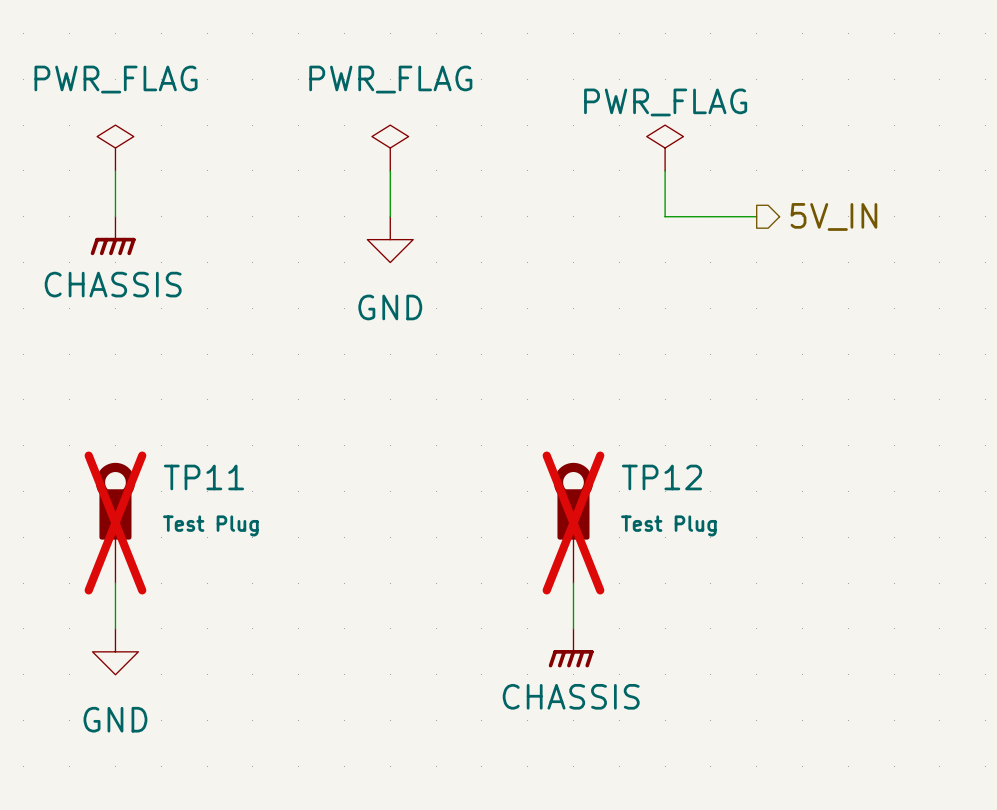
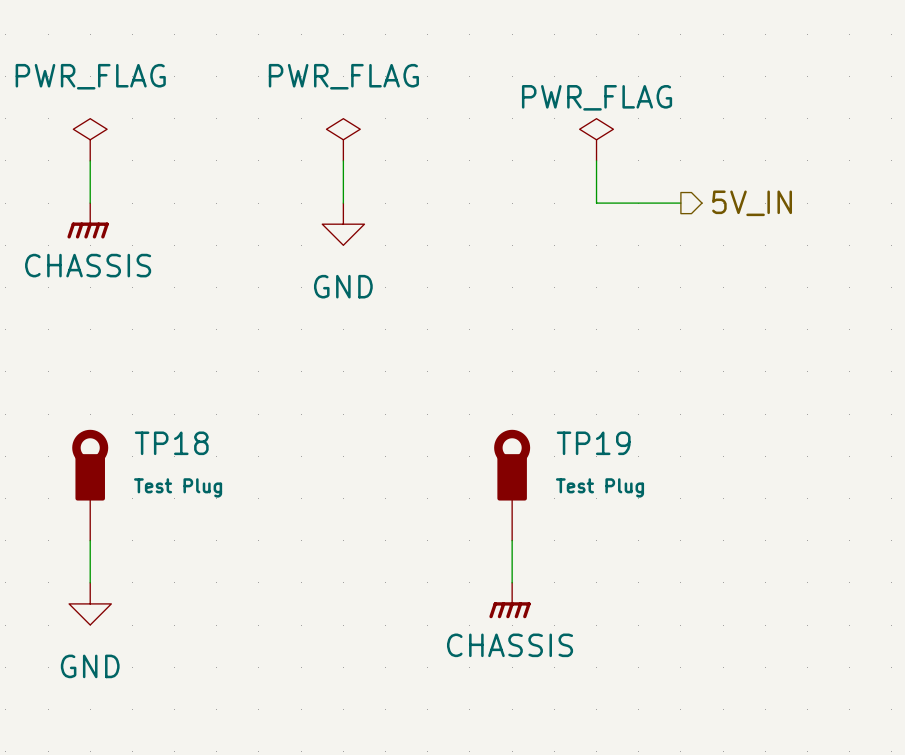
TP11 name: TP11 (203, 477) -> TP18 (171, 443)
TP12 name: TP12 (661, 477) -> TP19 (593, 443)
TP11 do-not-place cross: (115, 522) -> none
TP12 do-not-place cross: (573, 522) -> none

